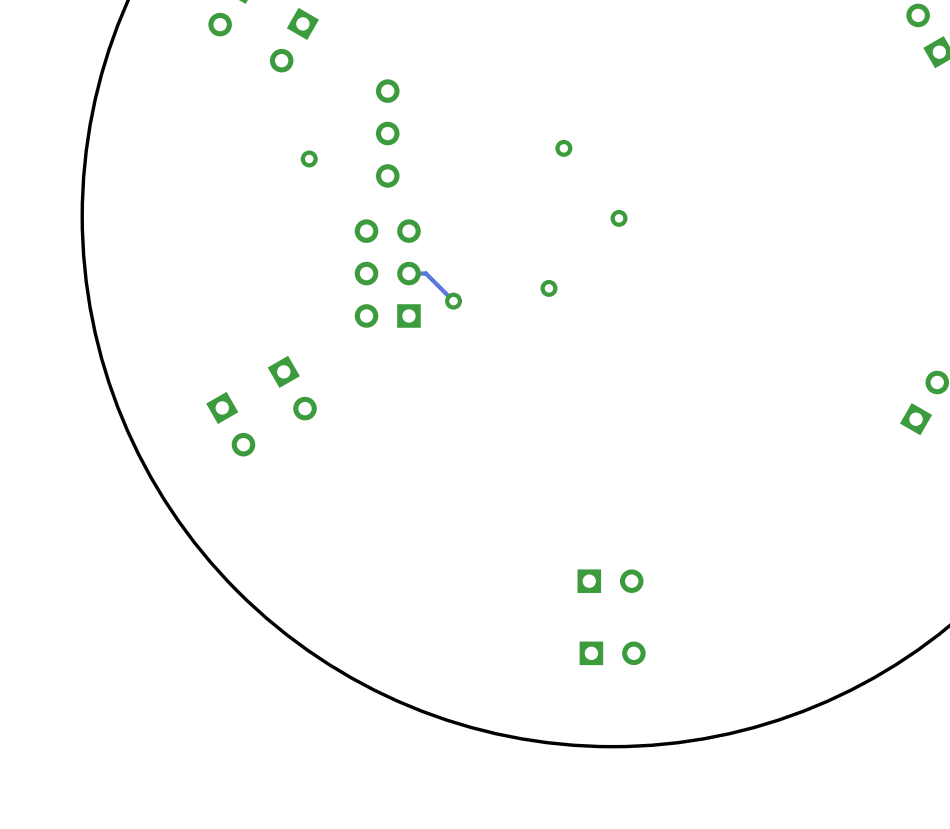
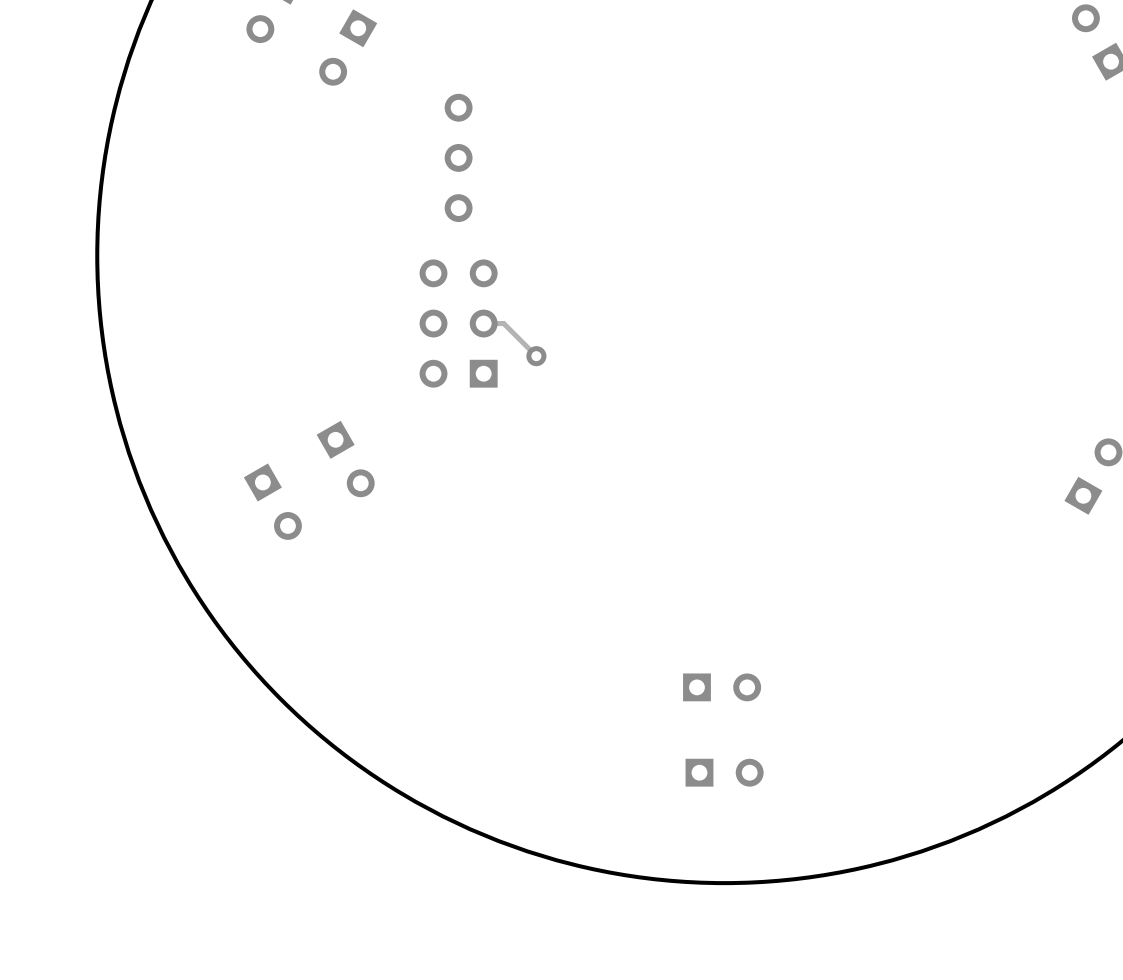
via: (563, 148) -> none
via: (309, 158) -> none
via: (619, 218) -> none
via: (548, 288) -> none

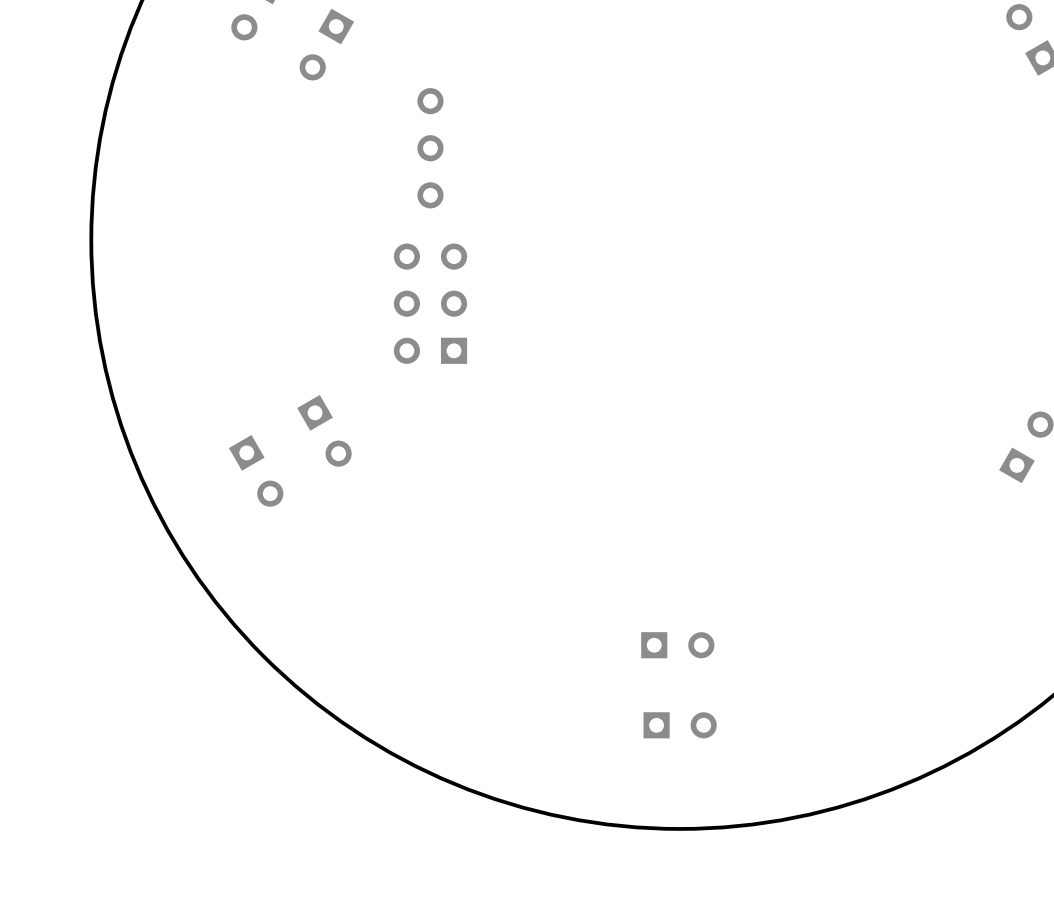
track: (483, 323) (503, 323) (536, 356) -> none
via: (536, 356) -> none

